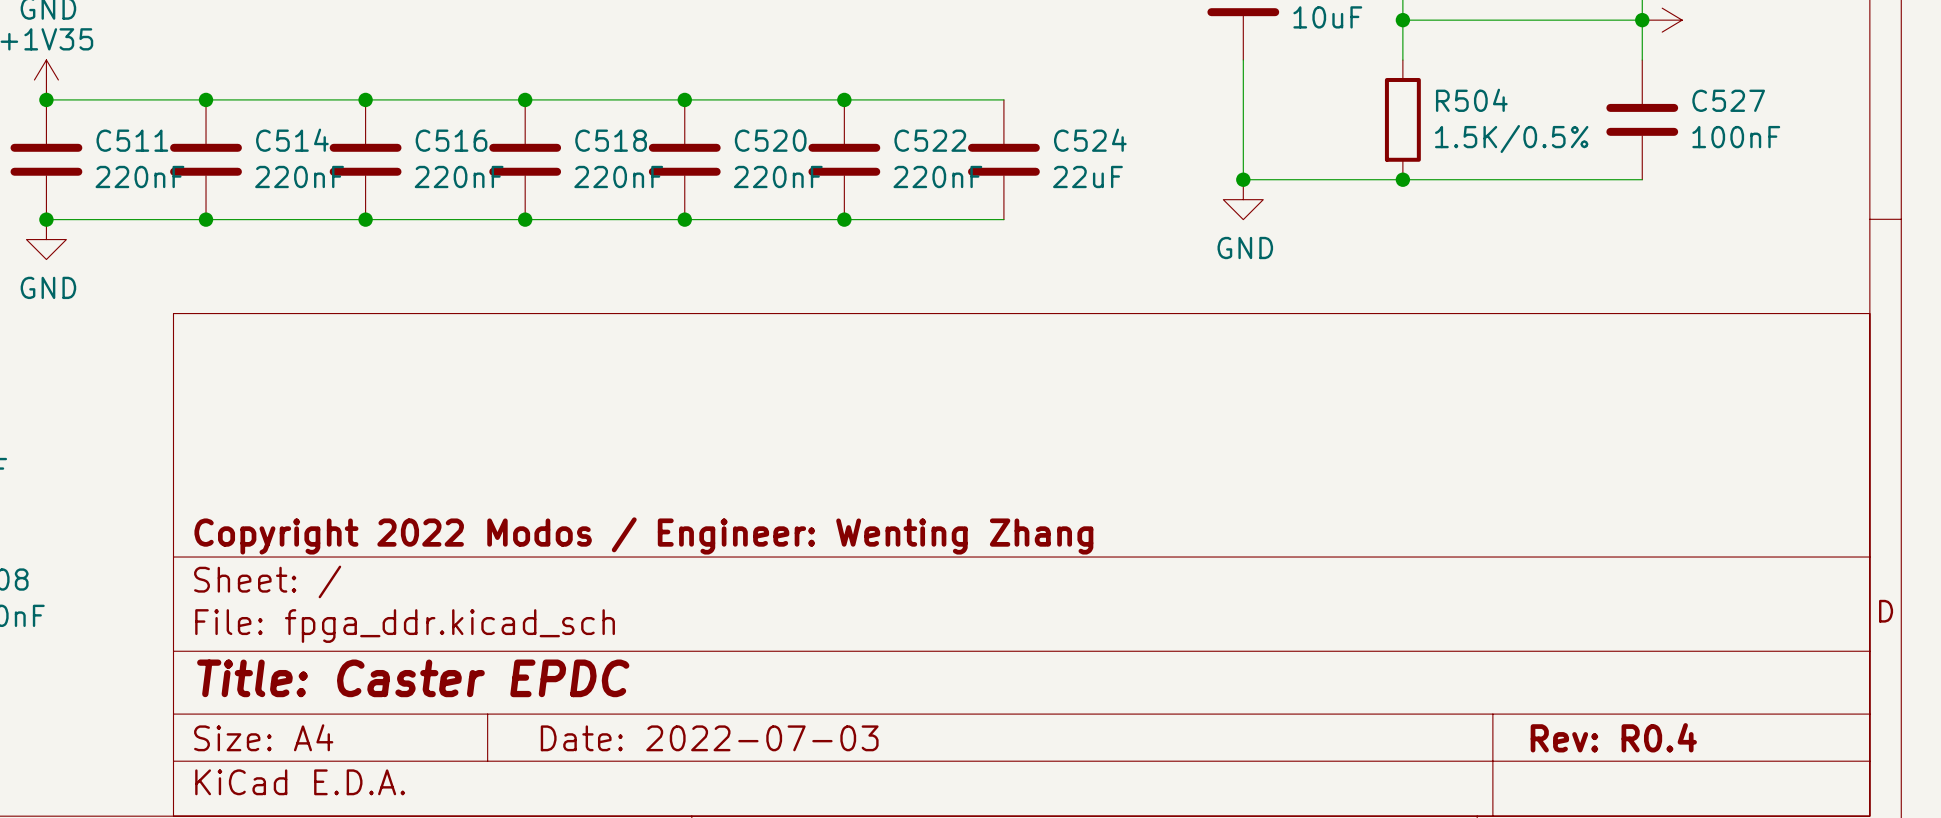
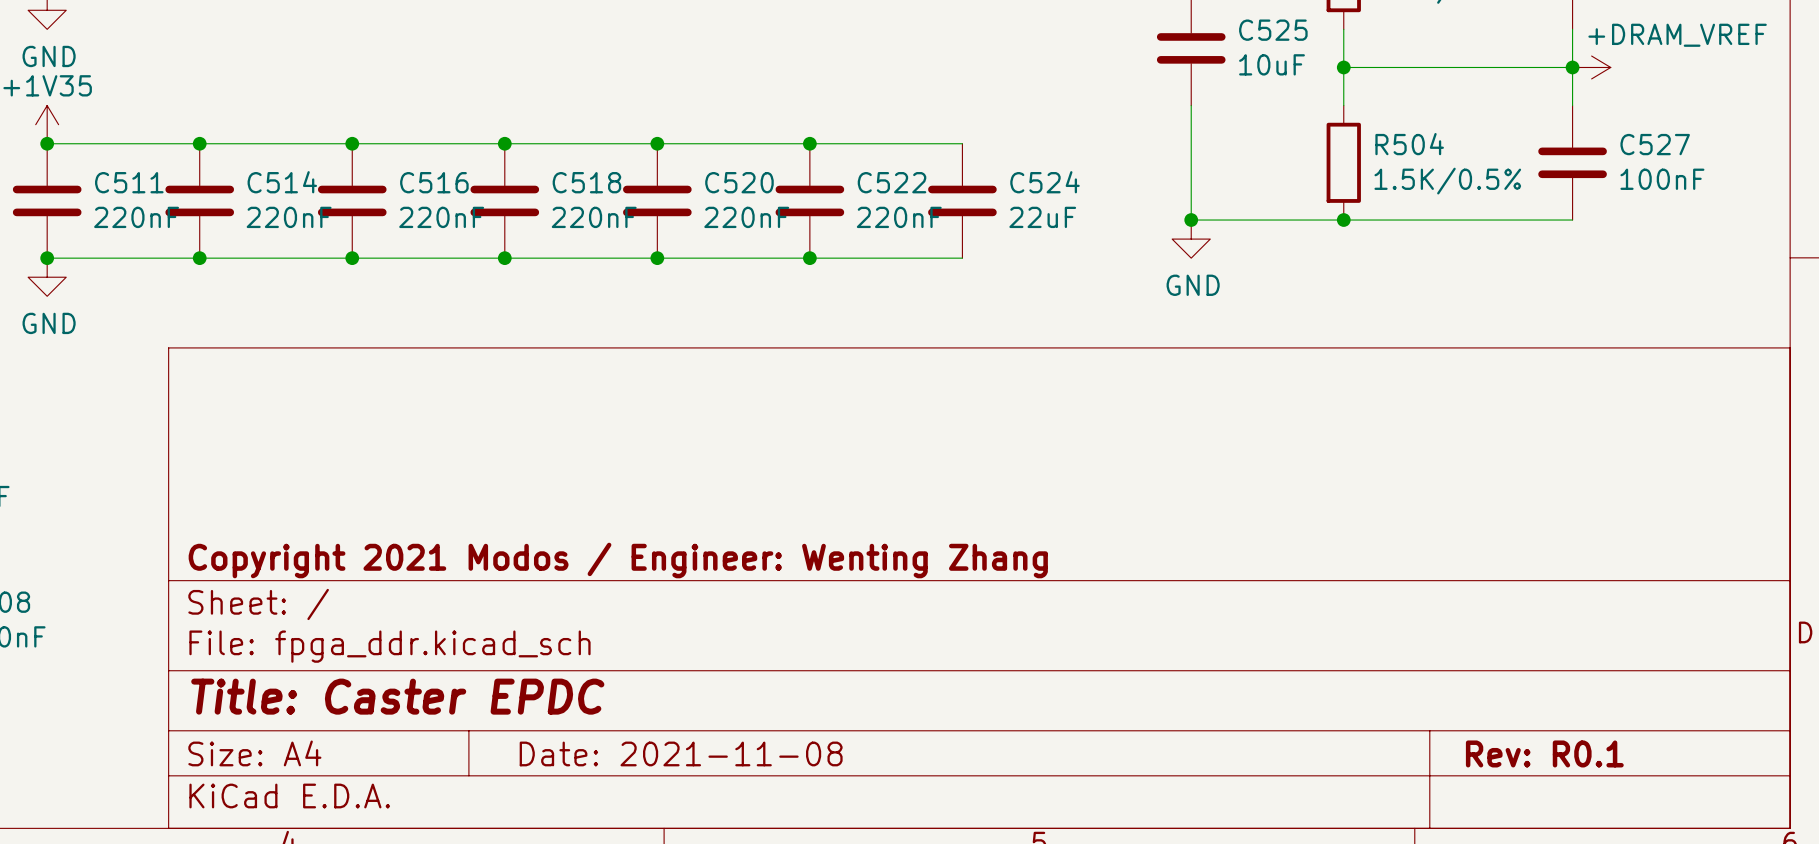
title block: Copyright 2022 Modos / Engineer: Wenting Zhang (643, 535) -> Copyright 2021 Modos / Engineer: Wenting Zhang (618, 560)
title block: Rev: R0.4 (1613, 737) -> Rev: R0.1 (1544, 753)
title block: Date: 2022-07-03 (709, 738) -> Date: 2021-11-08 (681, 753)

